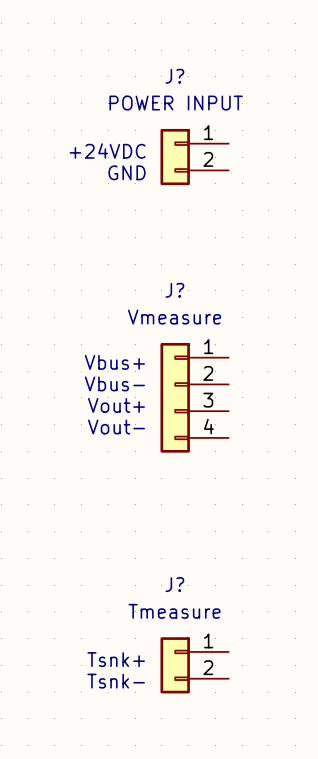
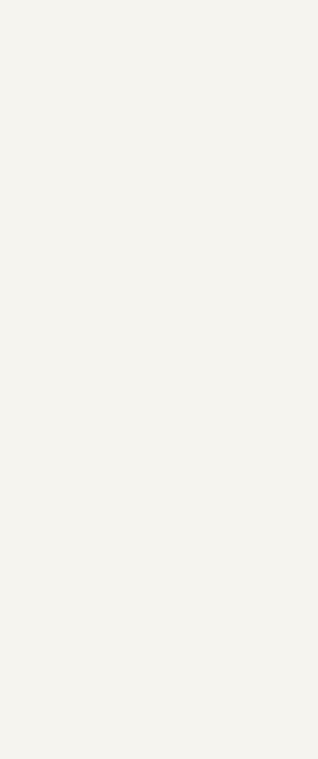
text: +24VDC (107, 150) -> none
J?: POWER INPUT (194, 157) -> none
text: GND (127, 172) -> none
text: Vbus+ (114, 362) -> none
text: Vbus- (114, 383) -> none
J?: Vmeasure (194, 397) -> none
text: Vout+ (116, 405) -> none
text: Vout- (116, 426) -> none
text: Tsnk+ (116, 659) -> none
J?: Tmeasure (194, 665) -> none
text: Tsnk- (116, 681) -> none

